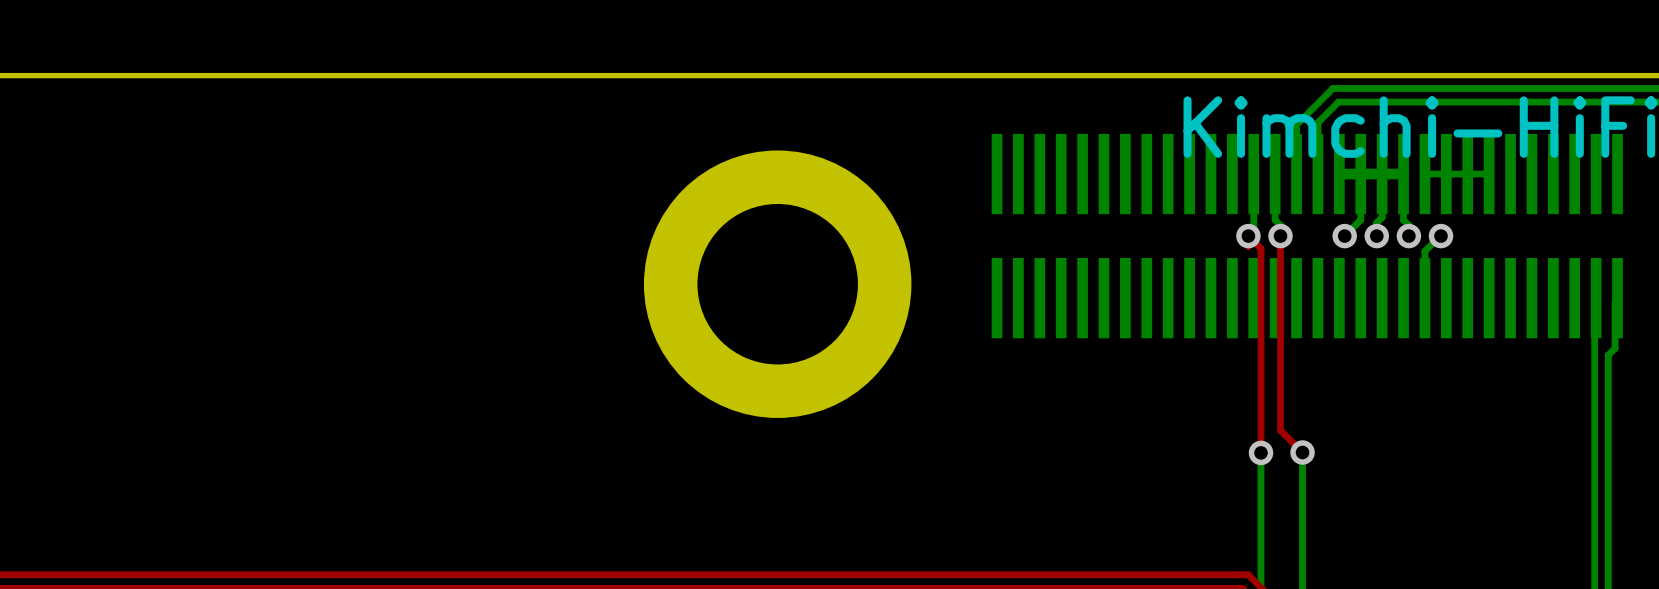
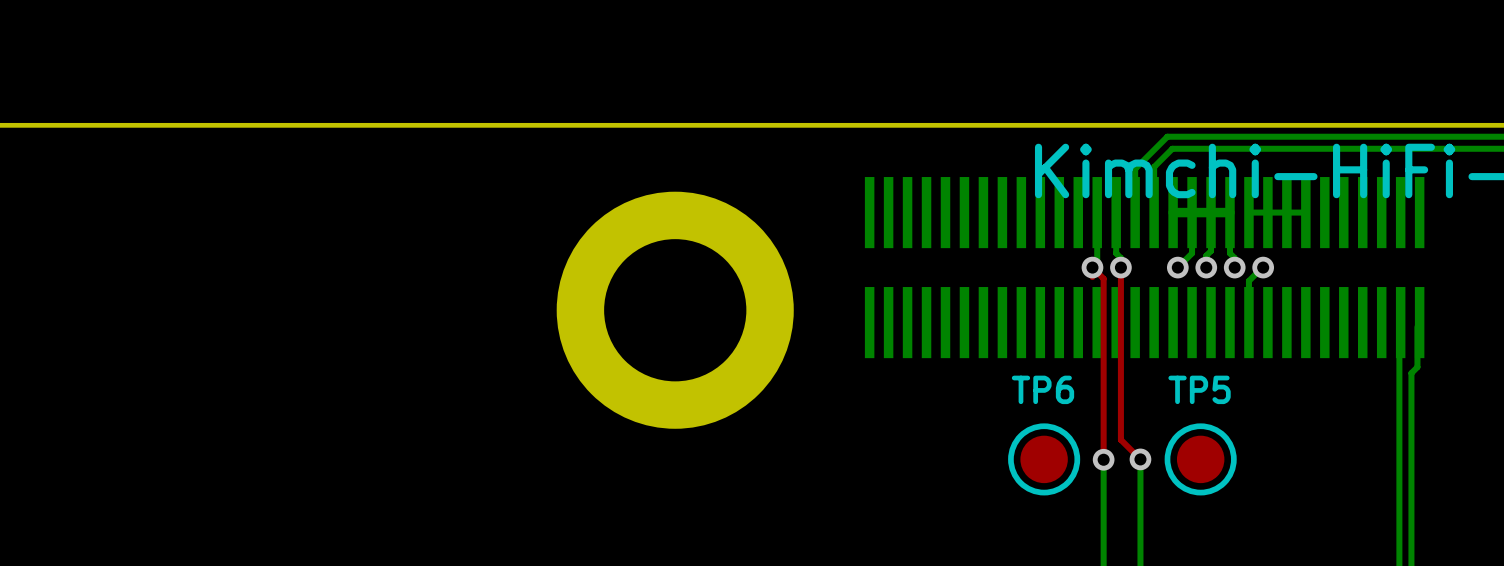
TP6: none -> (1044, 459)
TP5: none -> (1200, 459)

